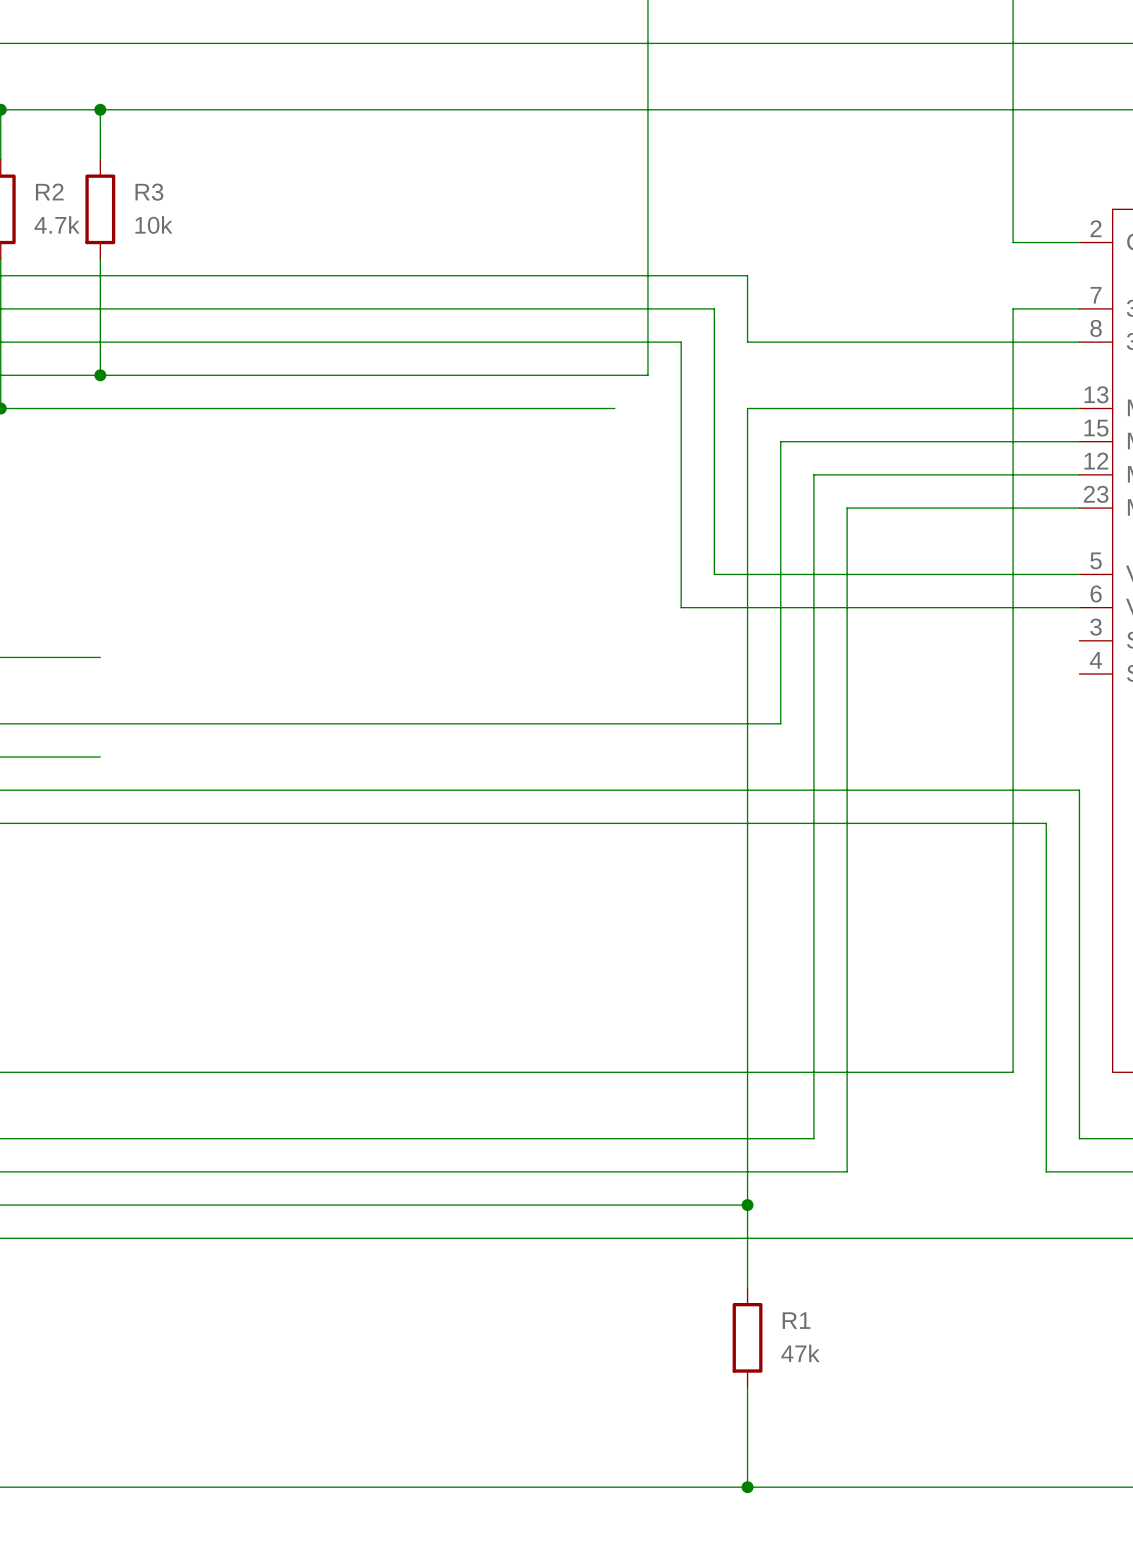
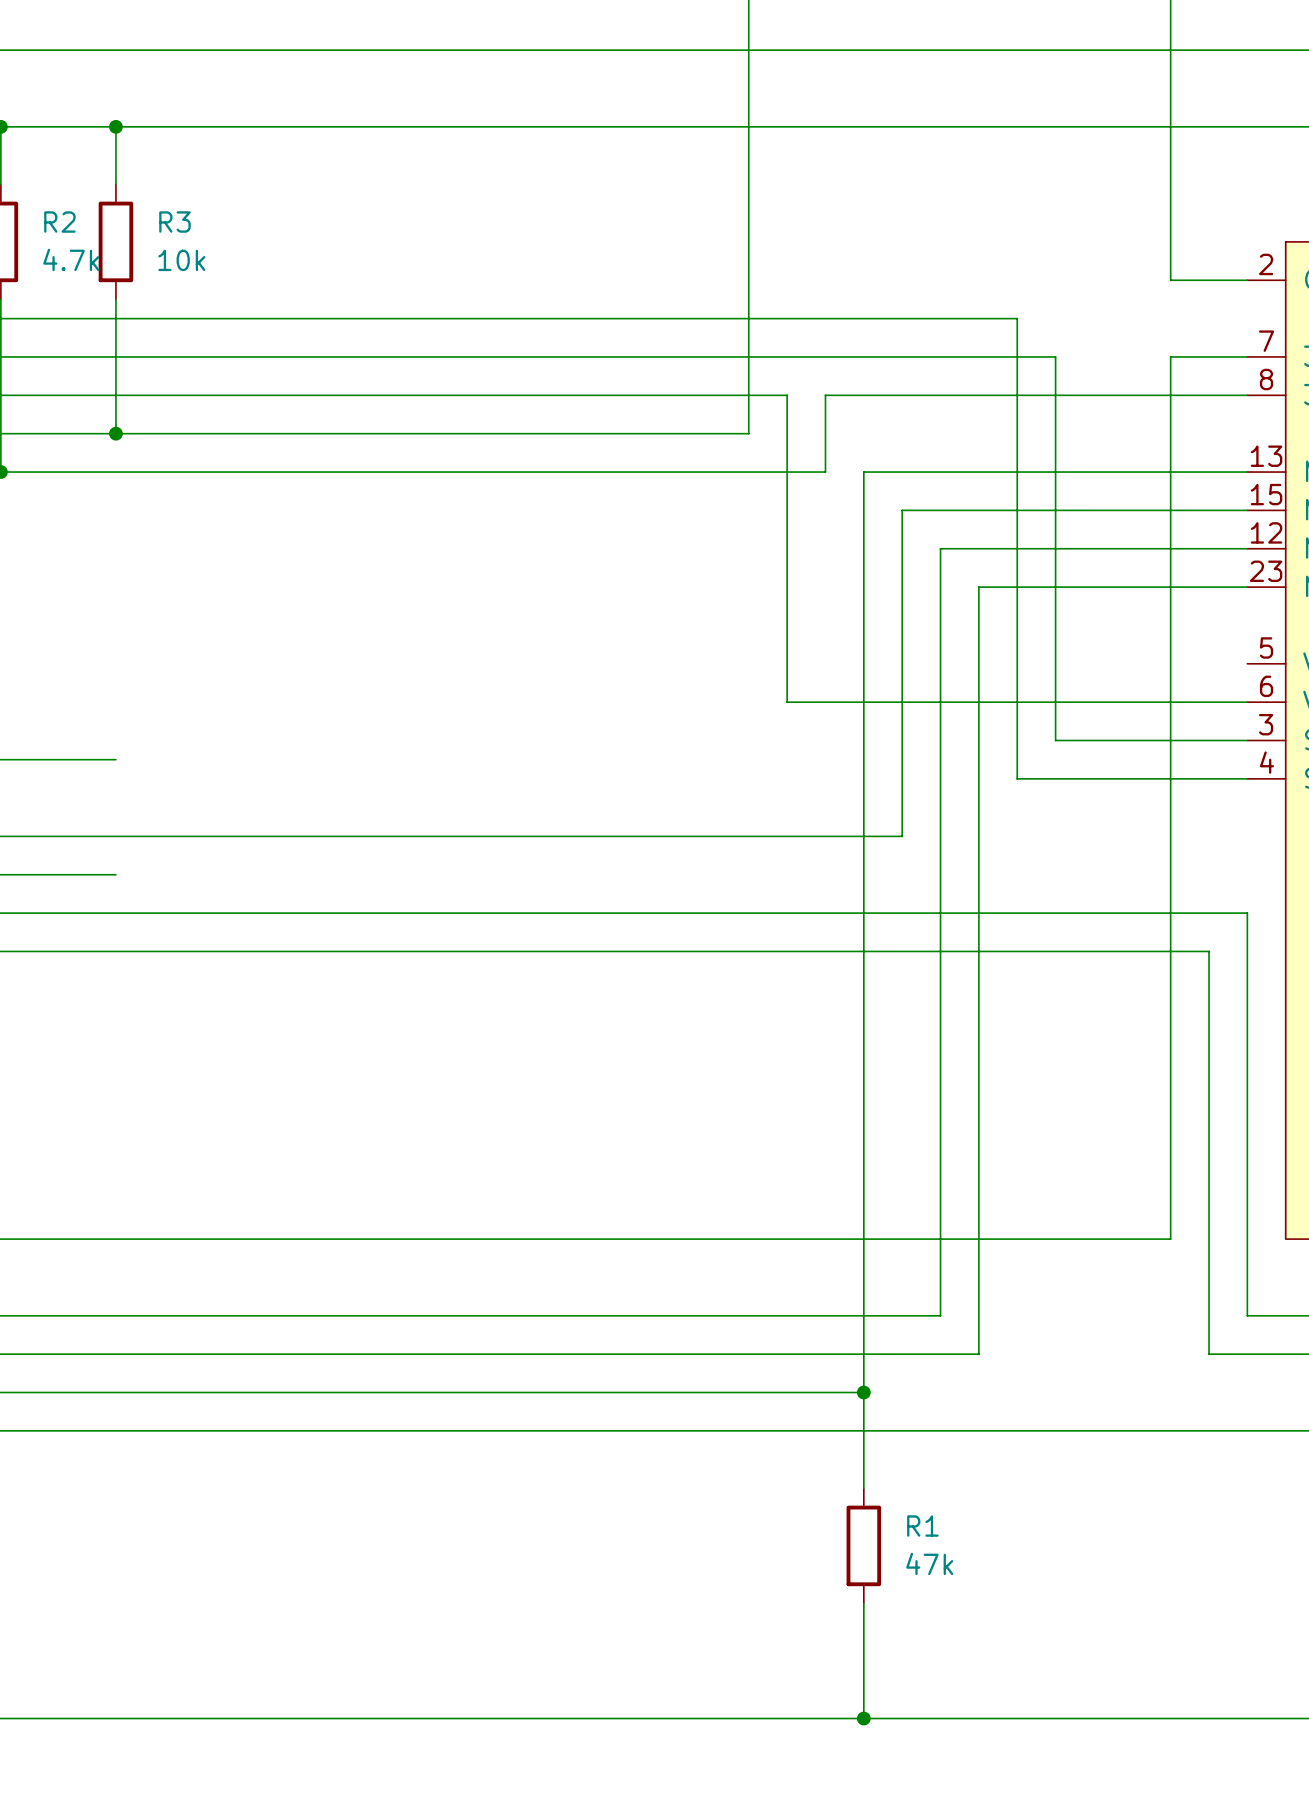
wire: (747, 275) (747, 342) -> (863, 318) (1017, 318) (1017, 778) (1247, 778)
wire: (714, 308) (714, 342) -> (863, 395) (825, 395)
wire: none -> (825, 356) (1055, 356) (1055, 740) (1247, 740)
wire: (714, 408) (714, 574) (1079, 574) -> (825, 472) (710, 472)

